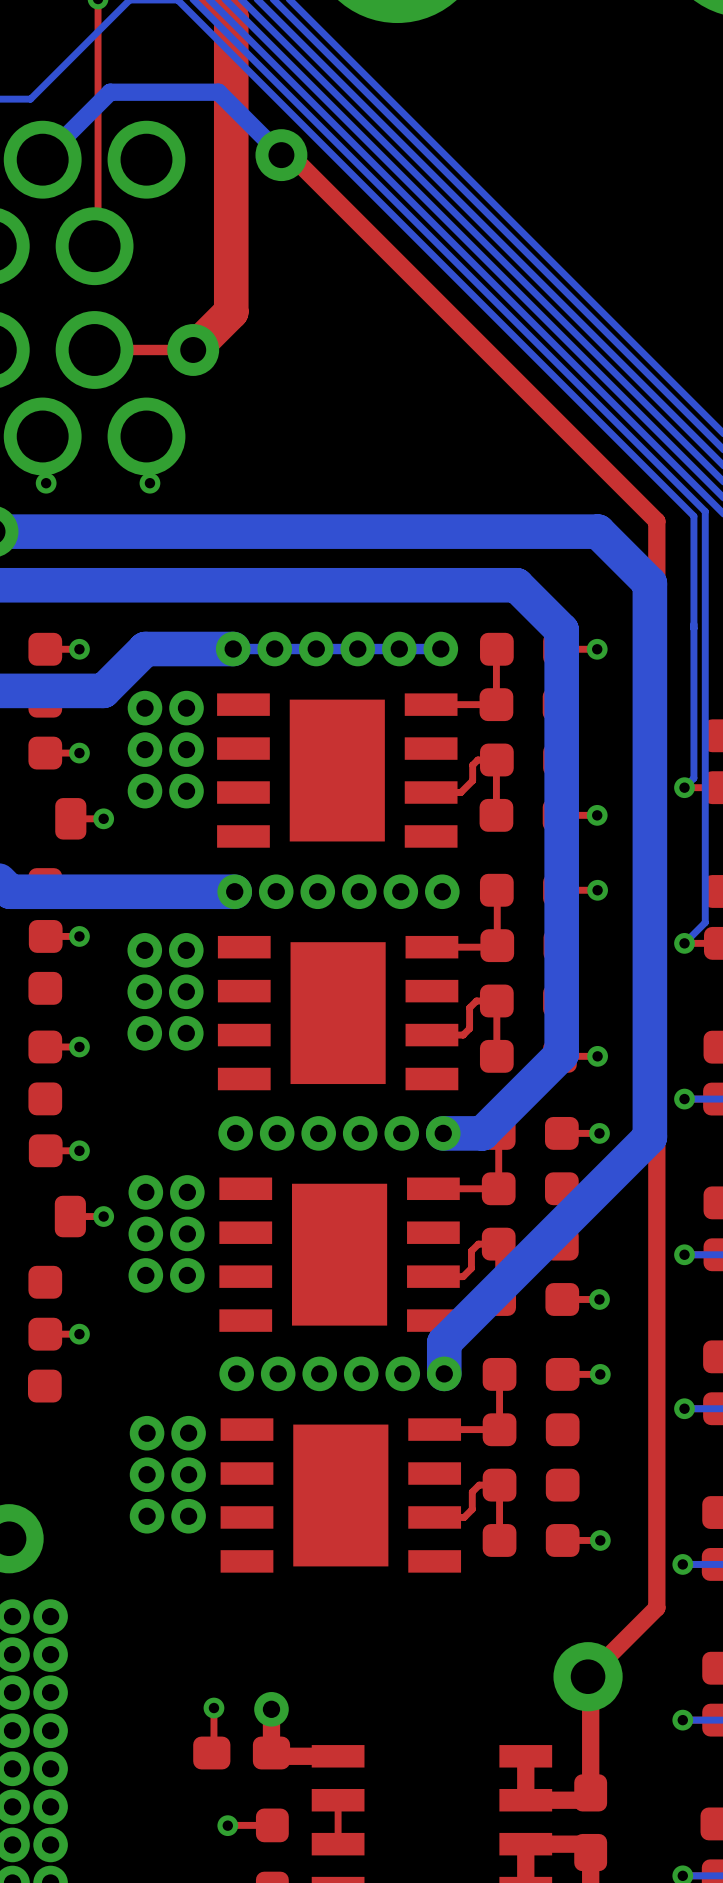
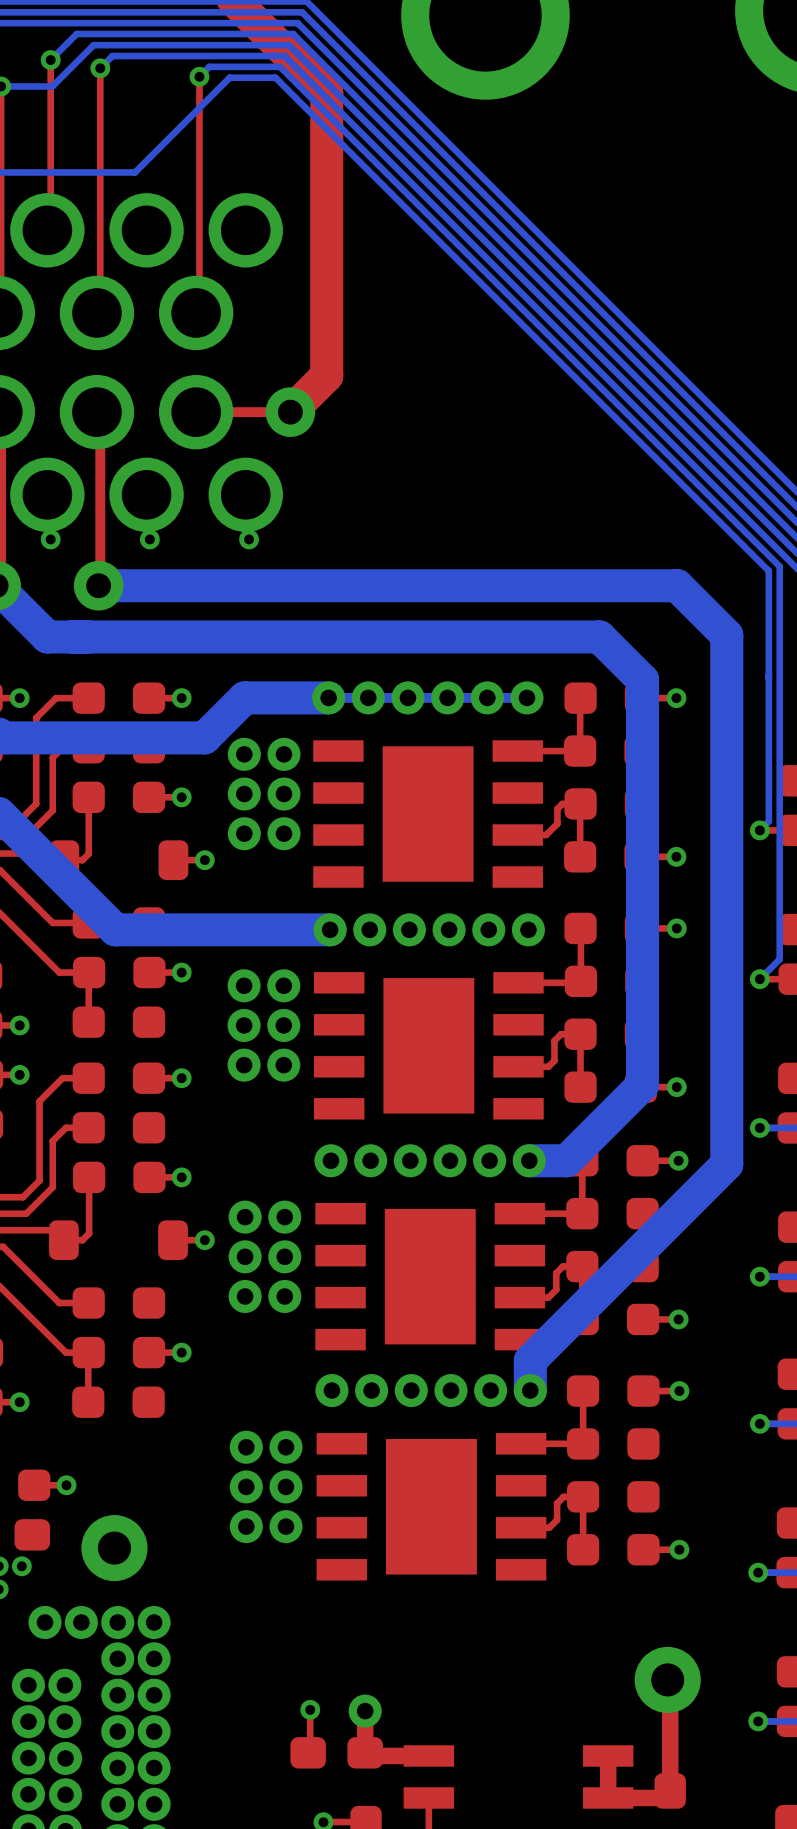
top track: (281, 155) (290, 155) (656, 521) (656, 1607) (588, 1676) -> none
bottom track: (281, 155) (218, 92) (110, 92) (42, 159) -> none
via: (281, 155) -> none

